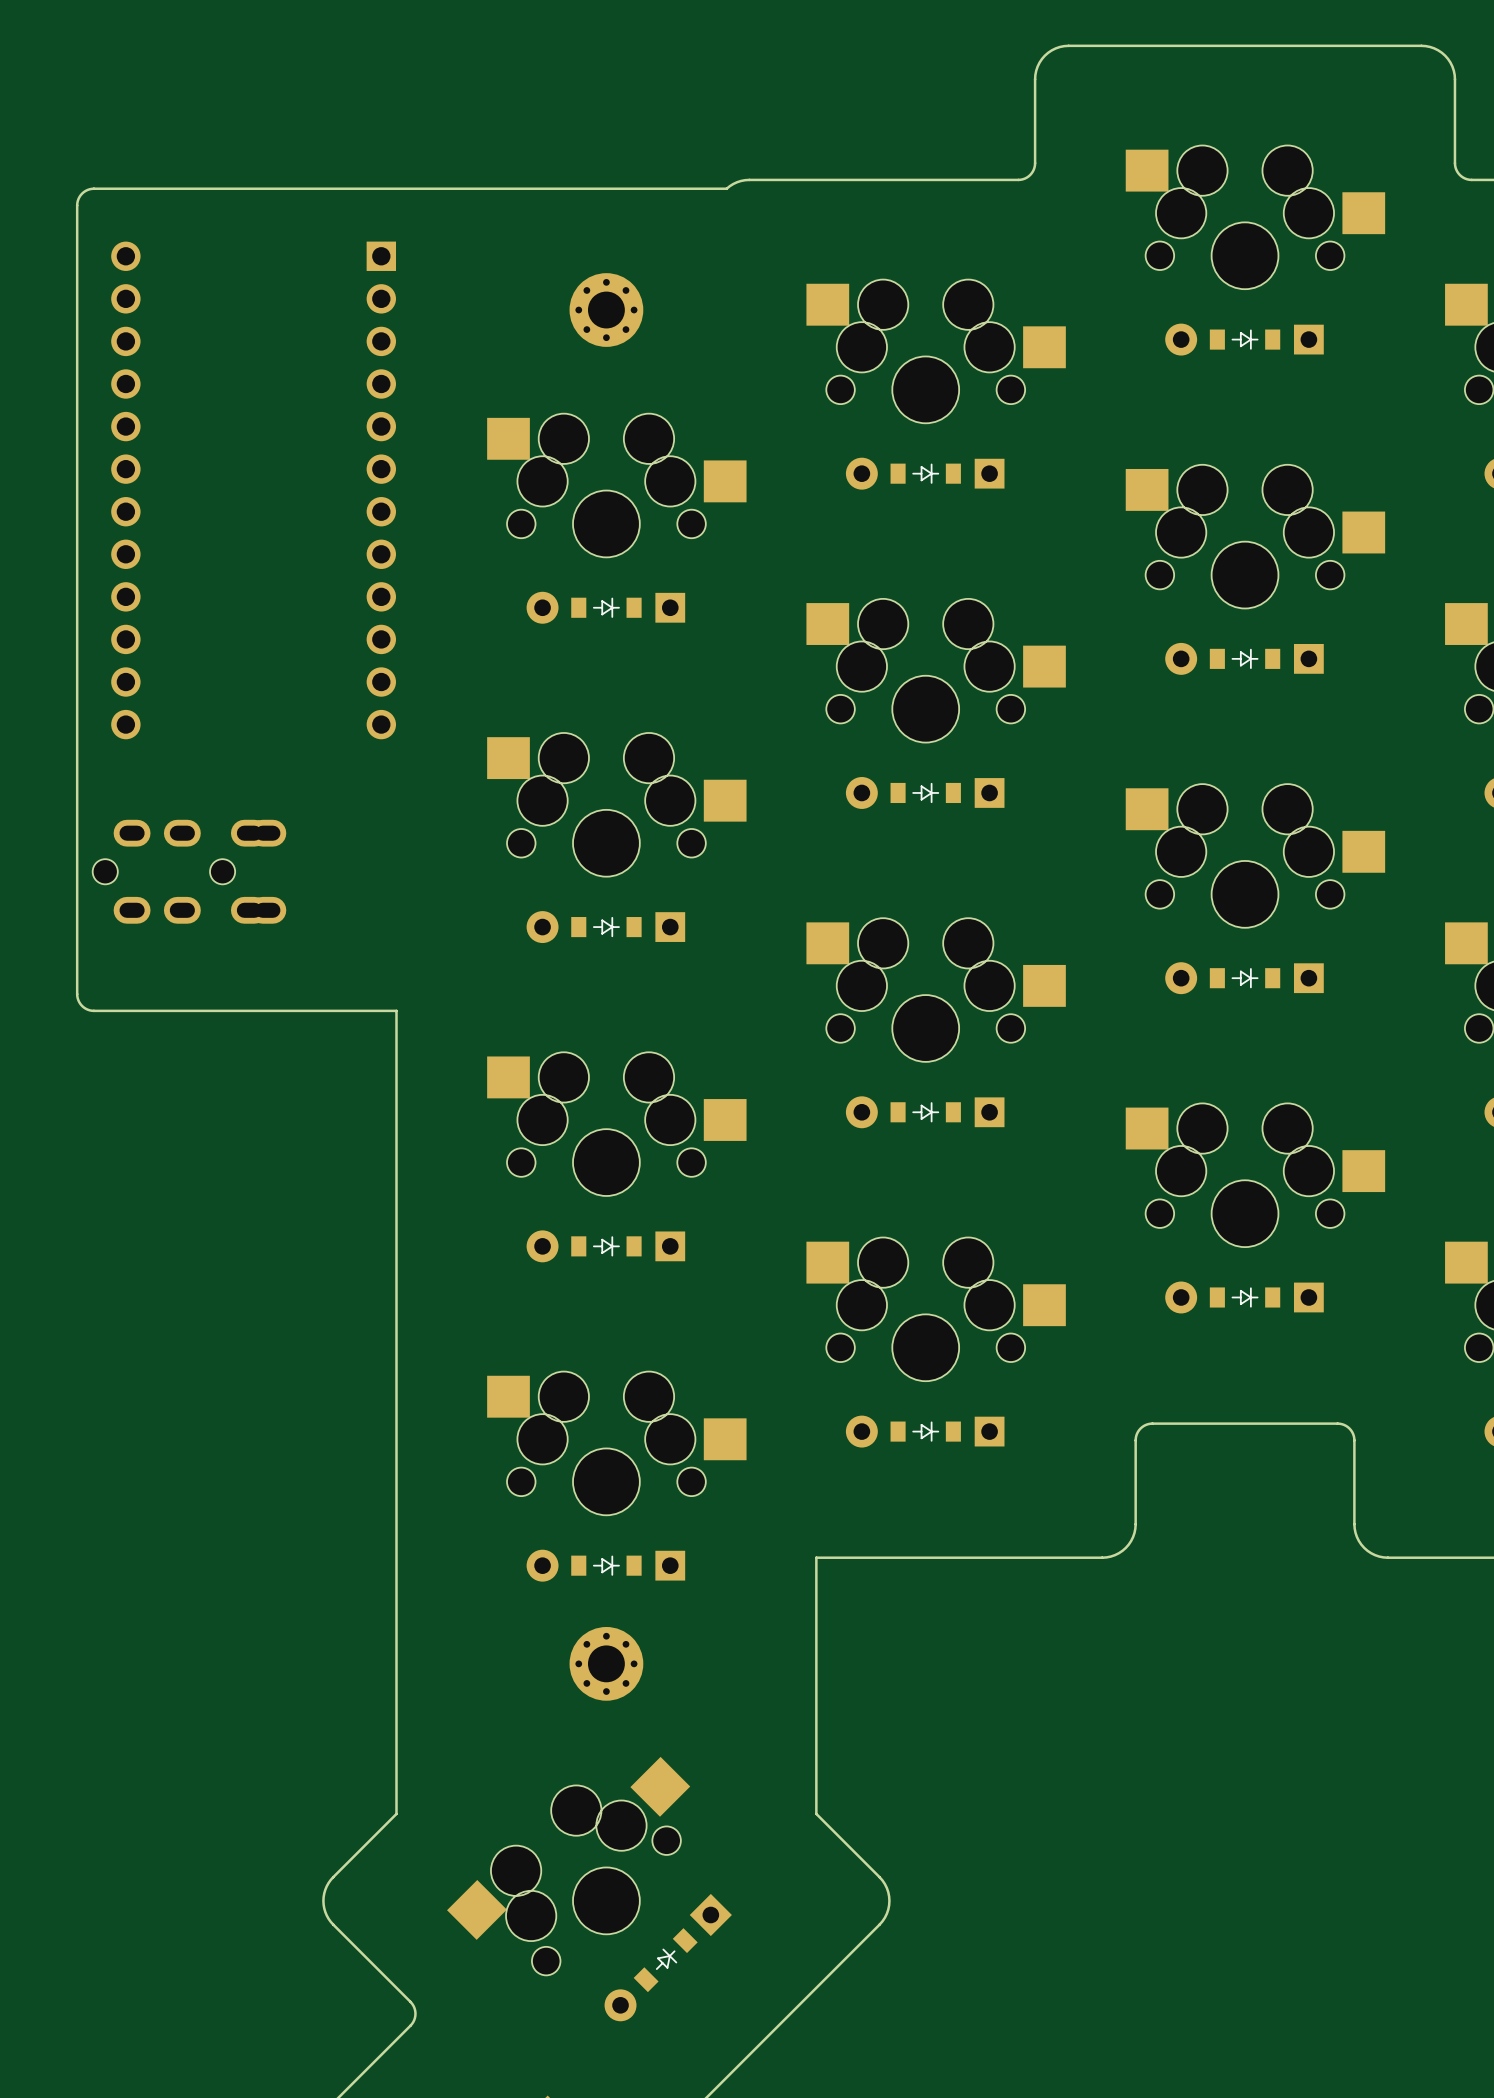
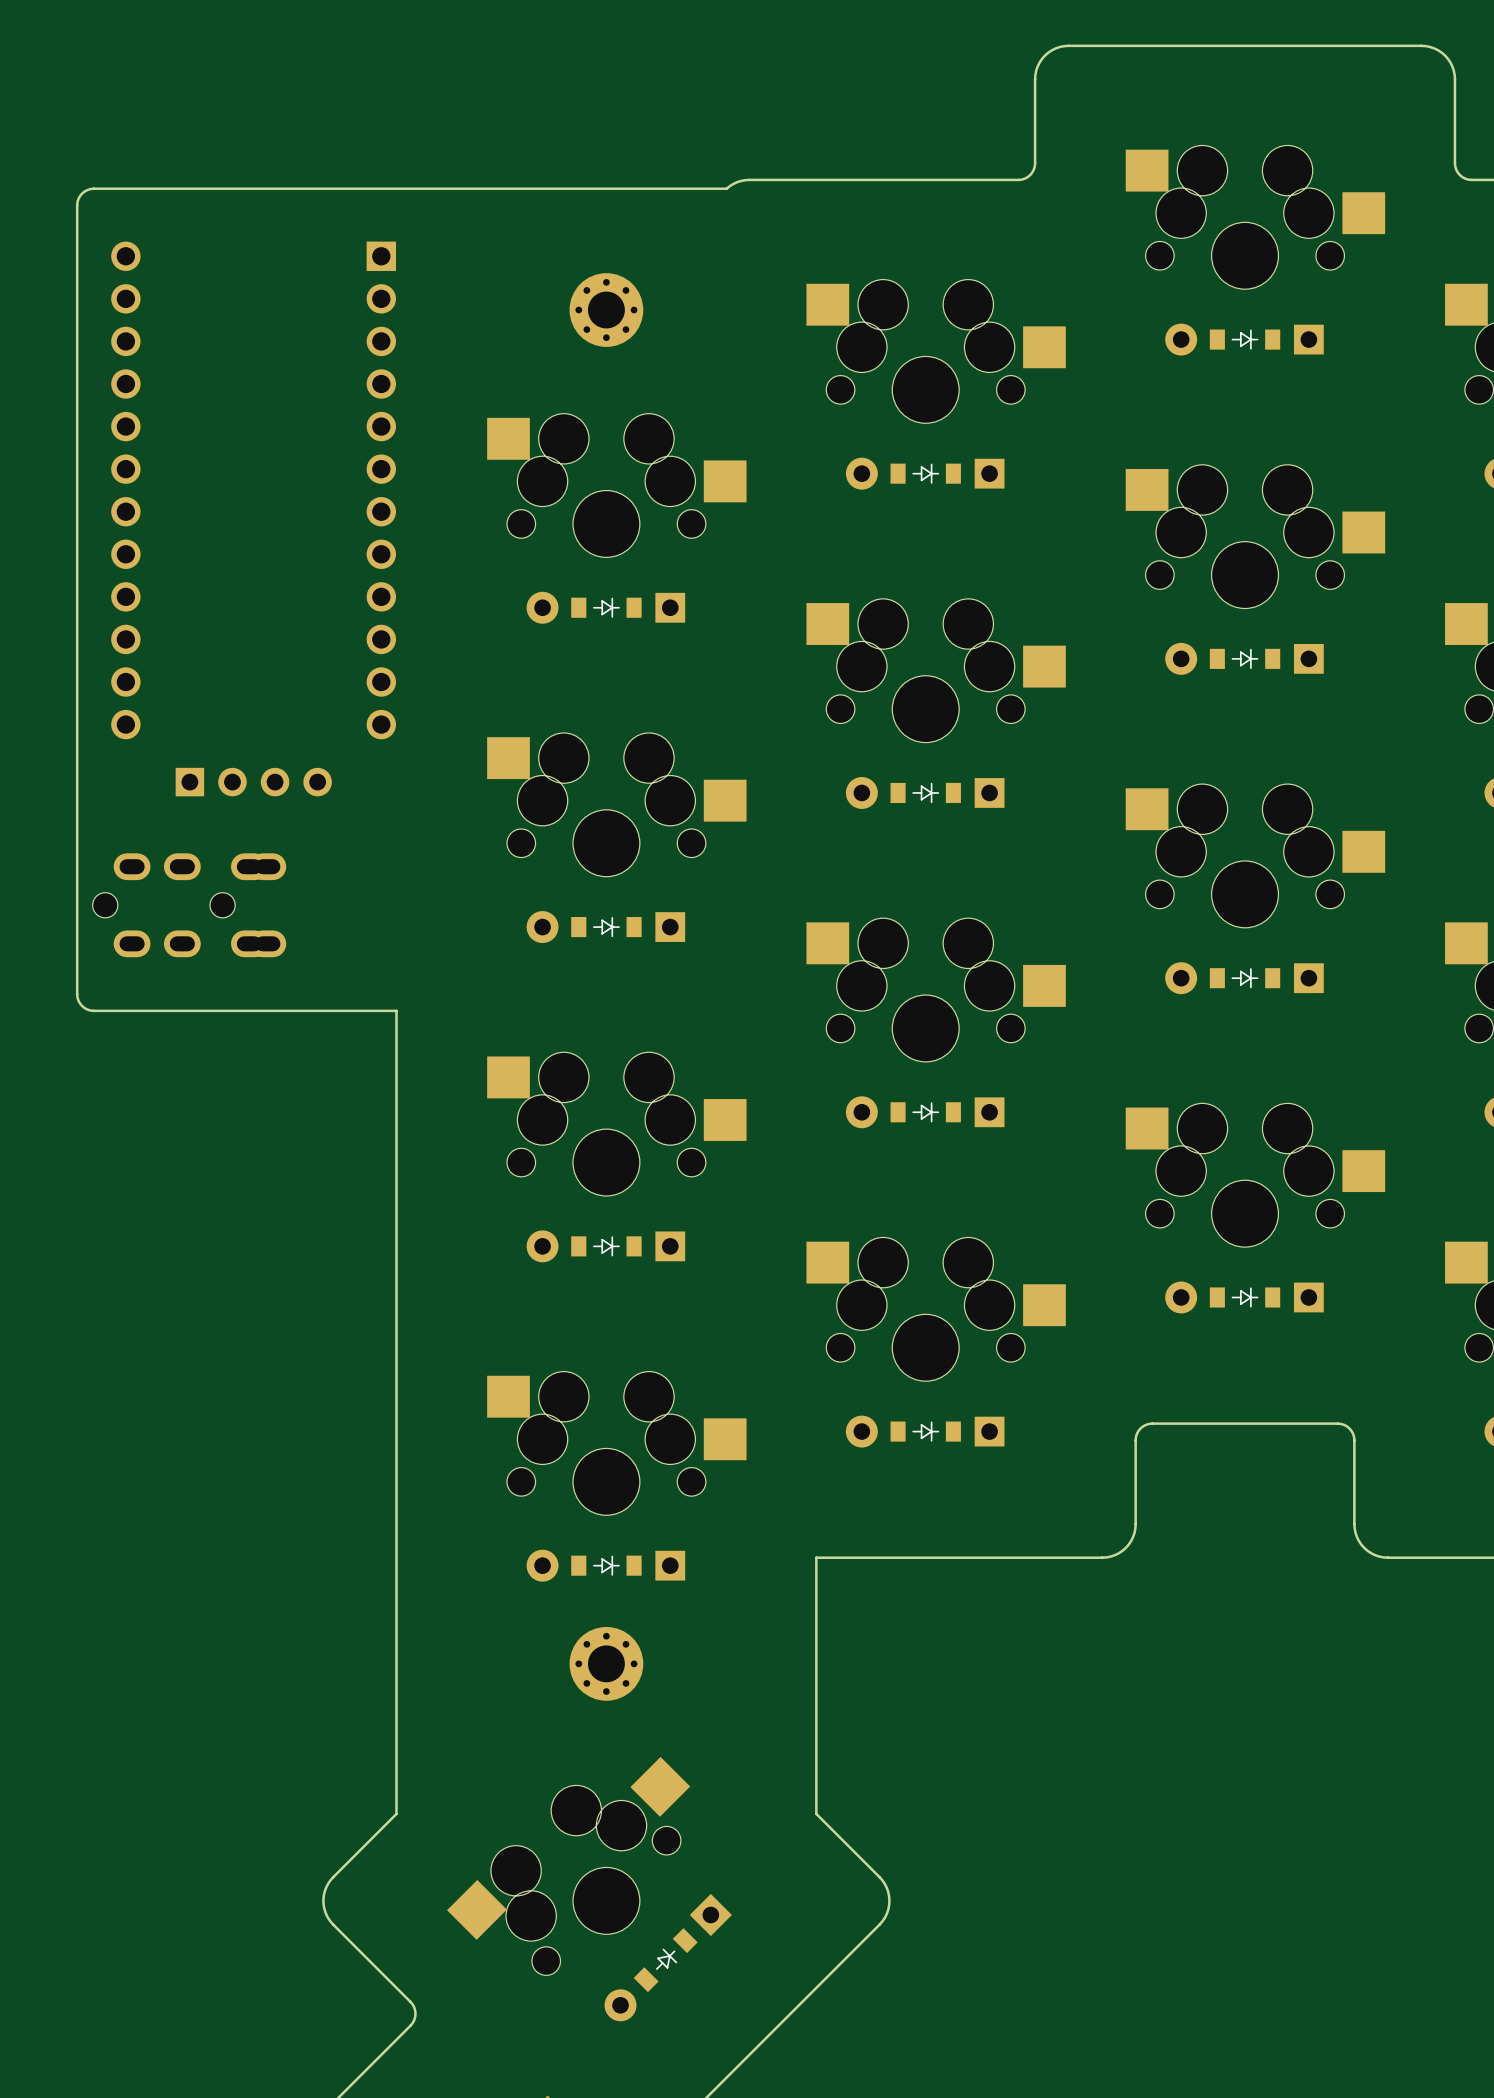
part: none -> (253, 782)
part position: (189, 871) -> (189, 905)

